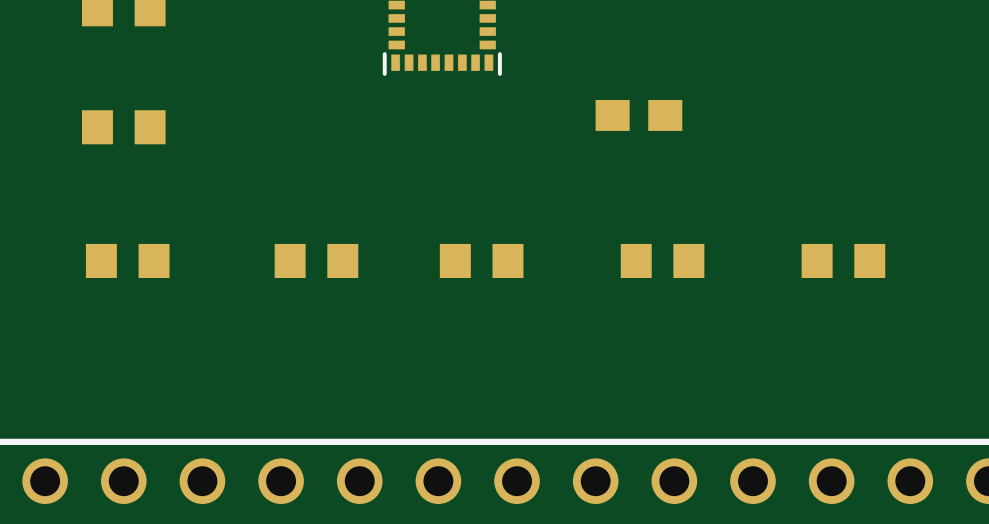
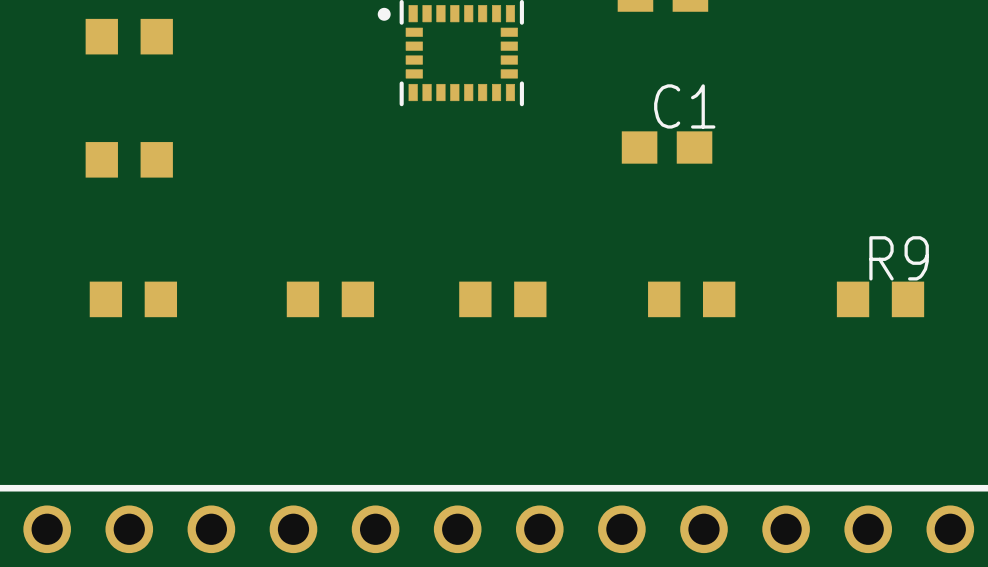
C1 name: none -> C1 (684, 106)
R9 name: none -> R9 (899, 258)

